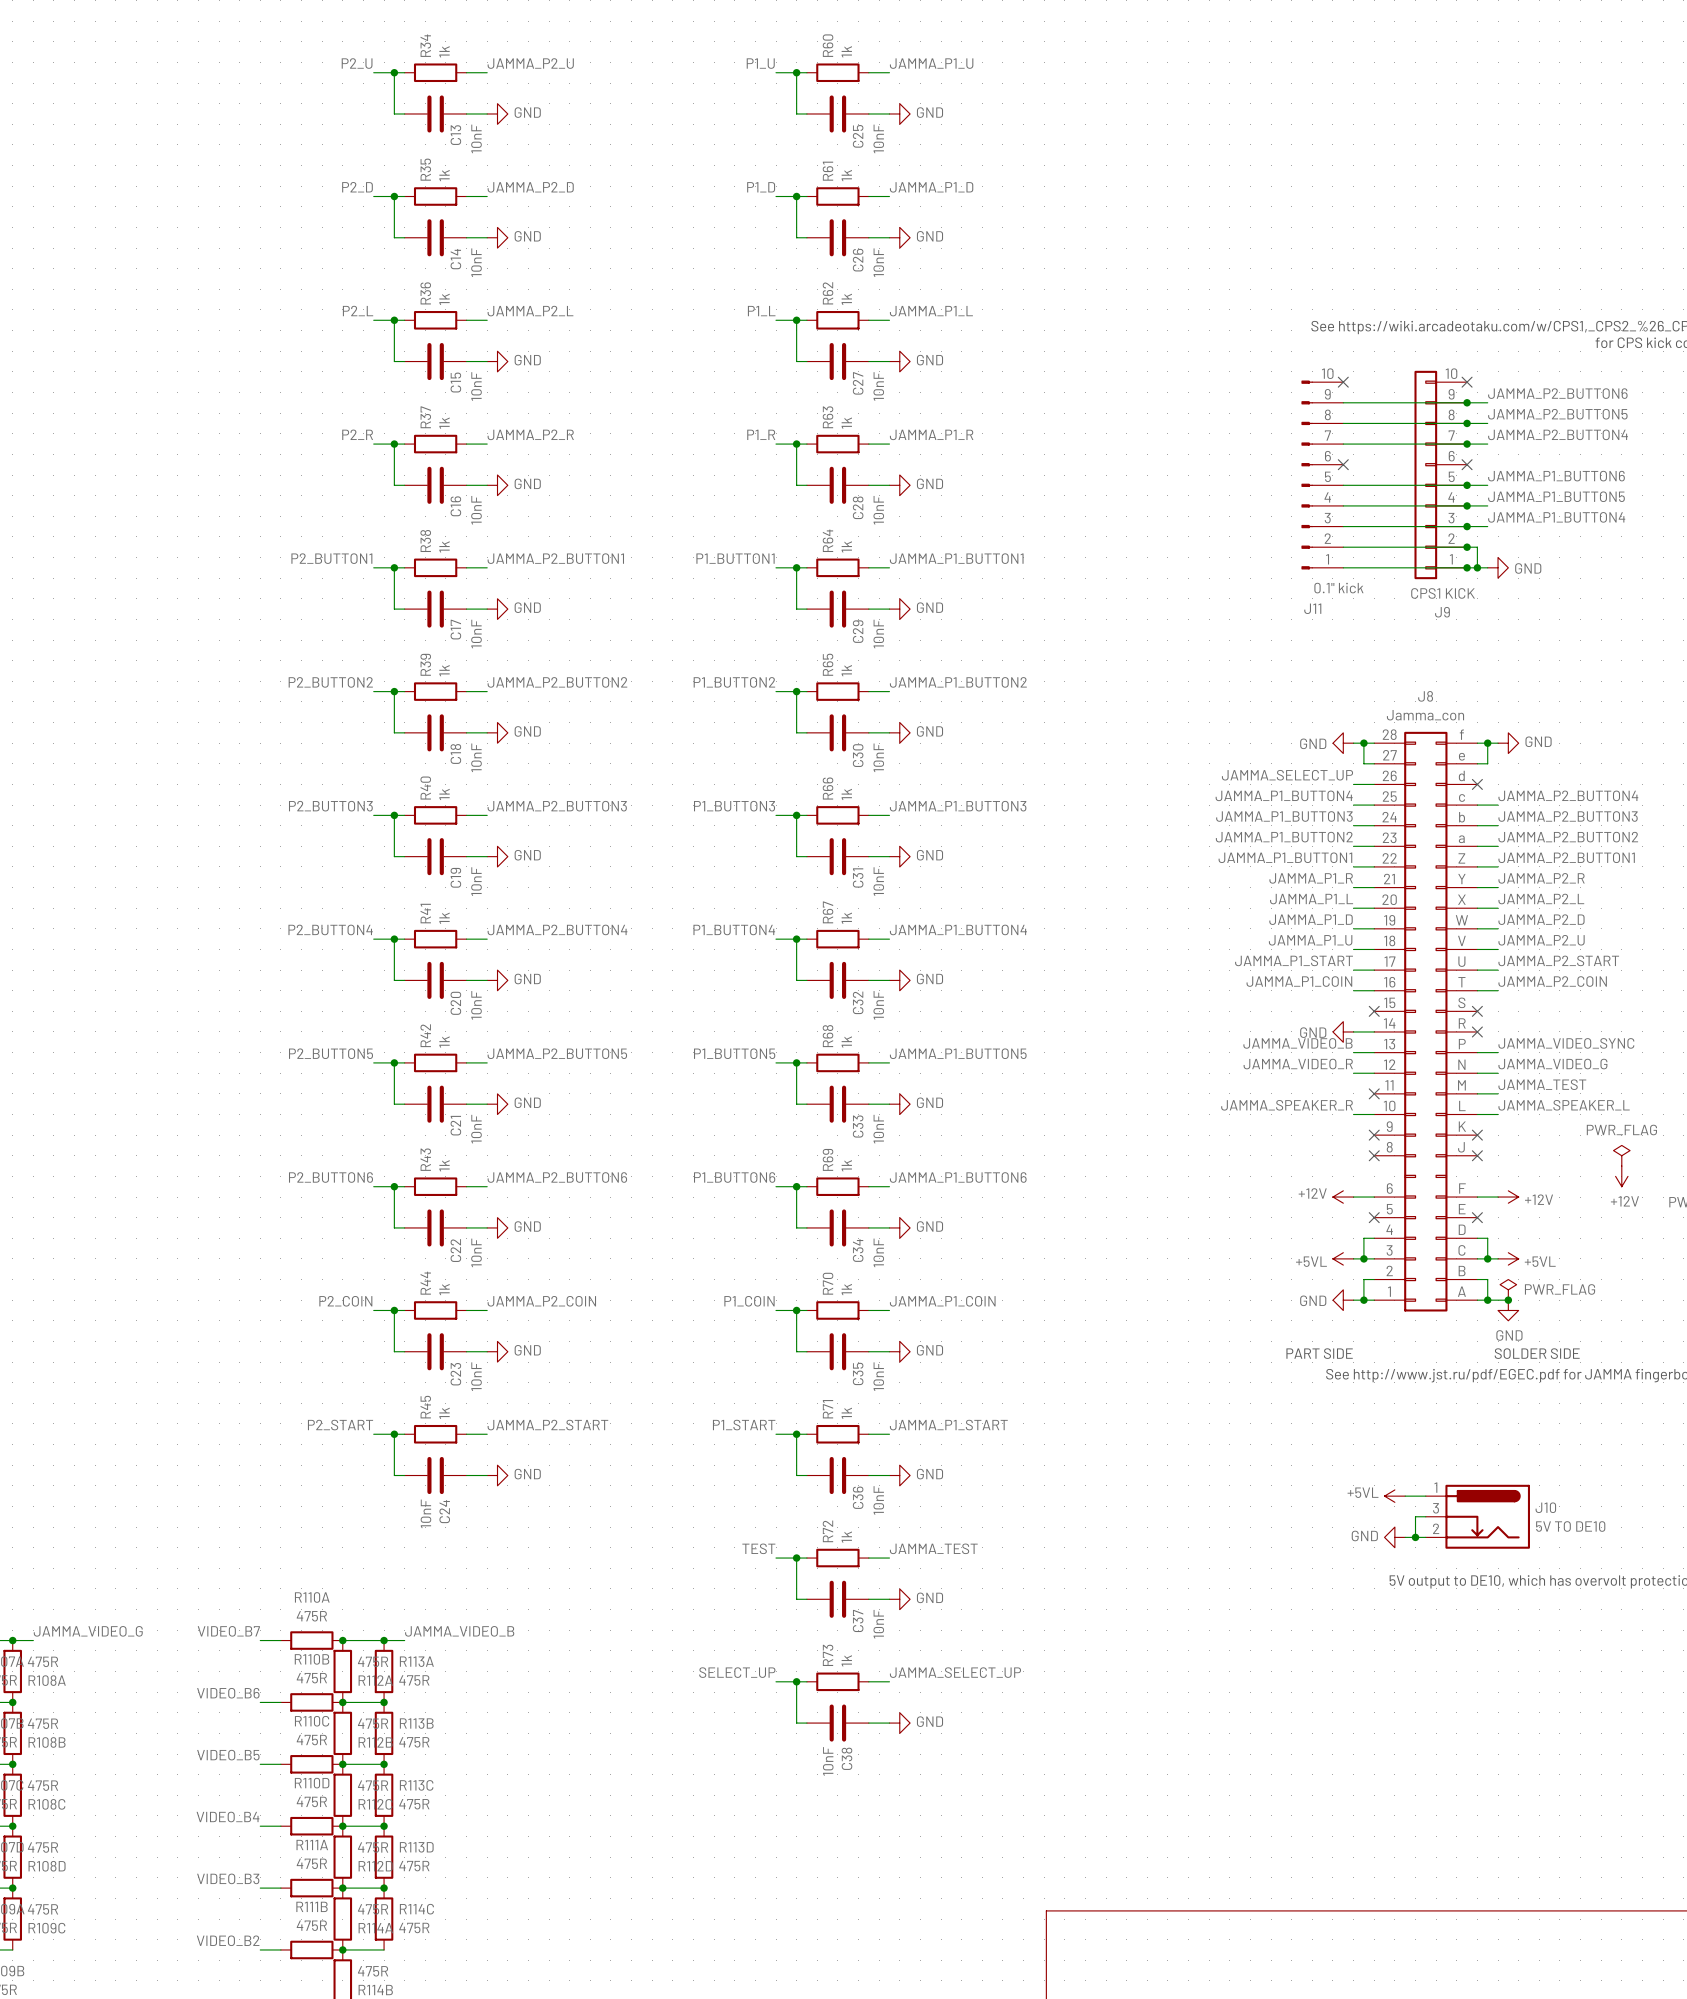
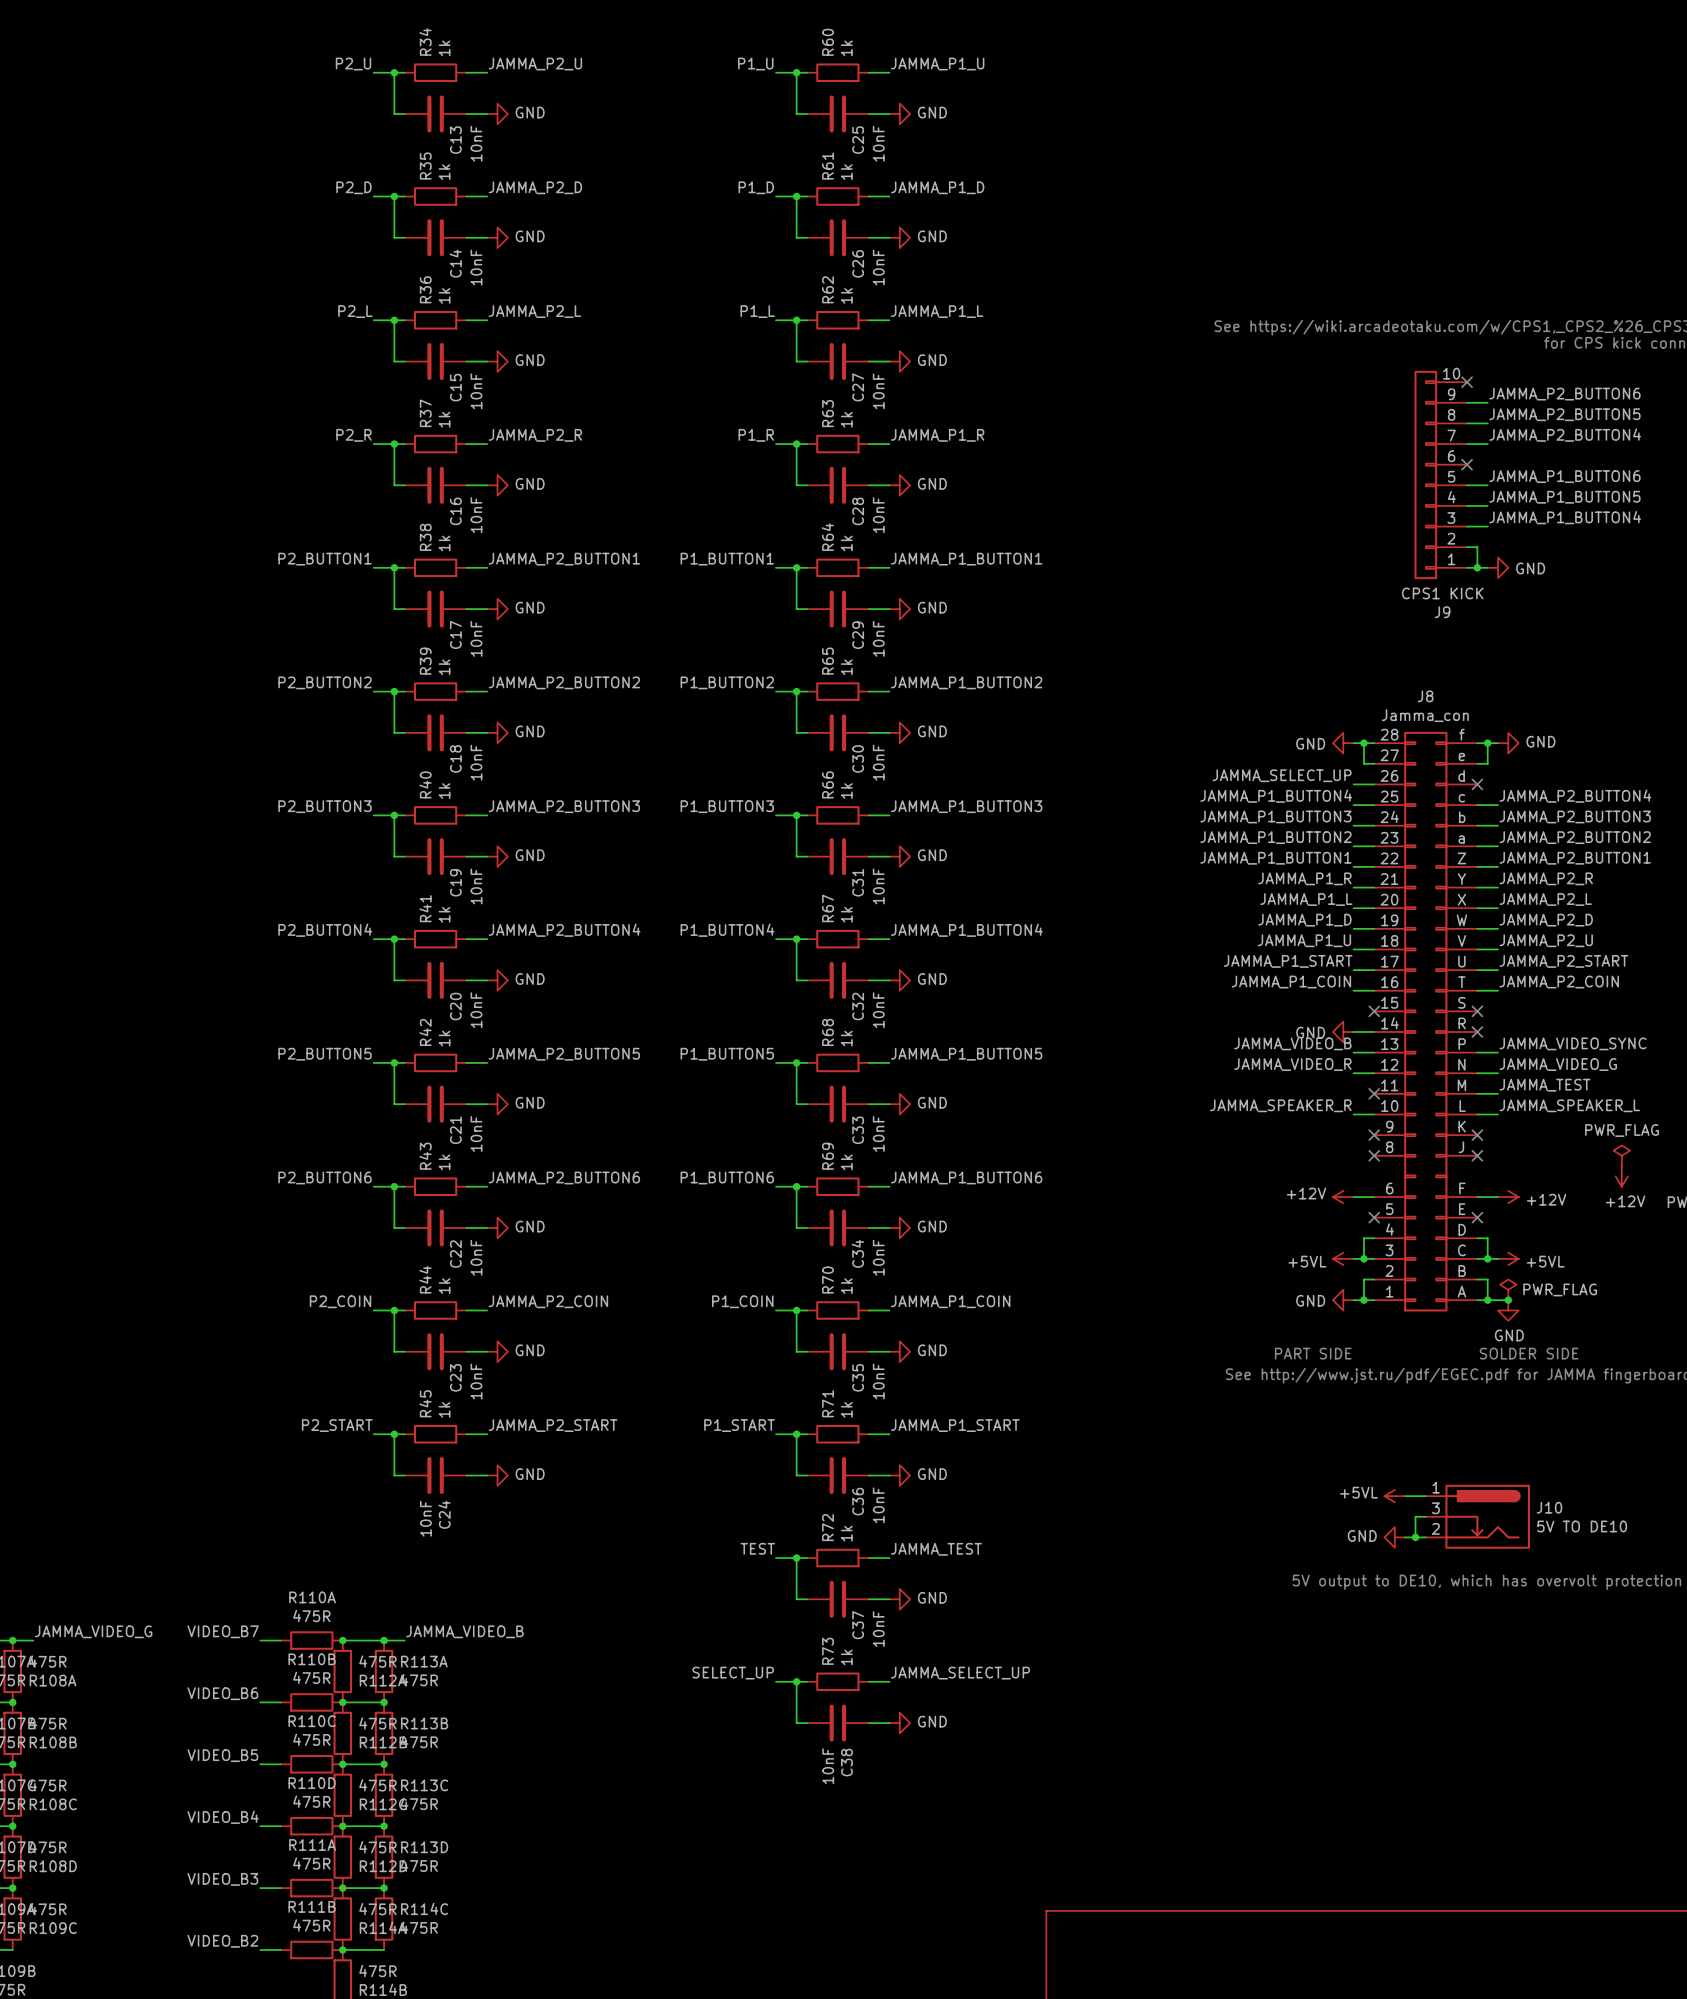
no-connect mark: (1343, 382) -> none
wire: (1343, 402) (1467, 402) -> none
junction: (1467, 402) -> none
wire: (1343, 423) (1467, 423) -> none
junction: (1467, 423) -> none
wire: (1343, 444) (1467, 444) -> none
junction: (1467, 444) -> none
no-connect mark: (1343, 464) -> none
J11: 0.1" kick (1322, 475) -> none
wire: (1343, 485) (1467, 485) -> none
junction: (1467, 485) -> none
wire: (1343, 505) (1467, 505) -> none
junction: (1467, 505) -> none
wire: (1343, 526) (1467, 526) -> none
junction: (1467, 526) -> none
wire: (1343, 547) (1467, 547) -> none
junction: (1467, 547) -> none
wire: (1343, 567) (1467, 567) -> none
junction: (1467, 567) -> none

